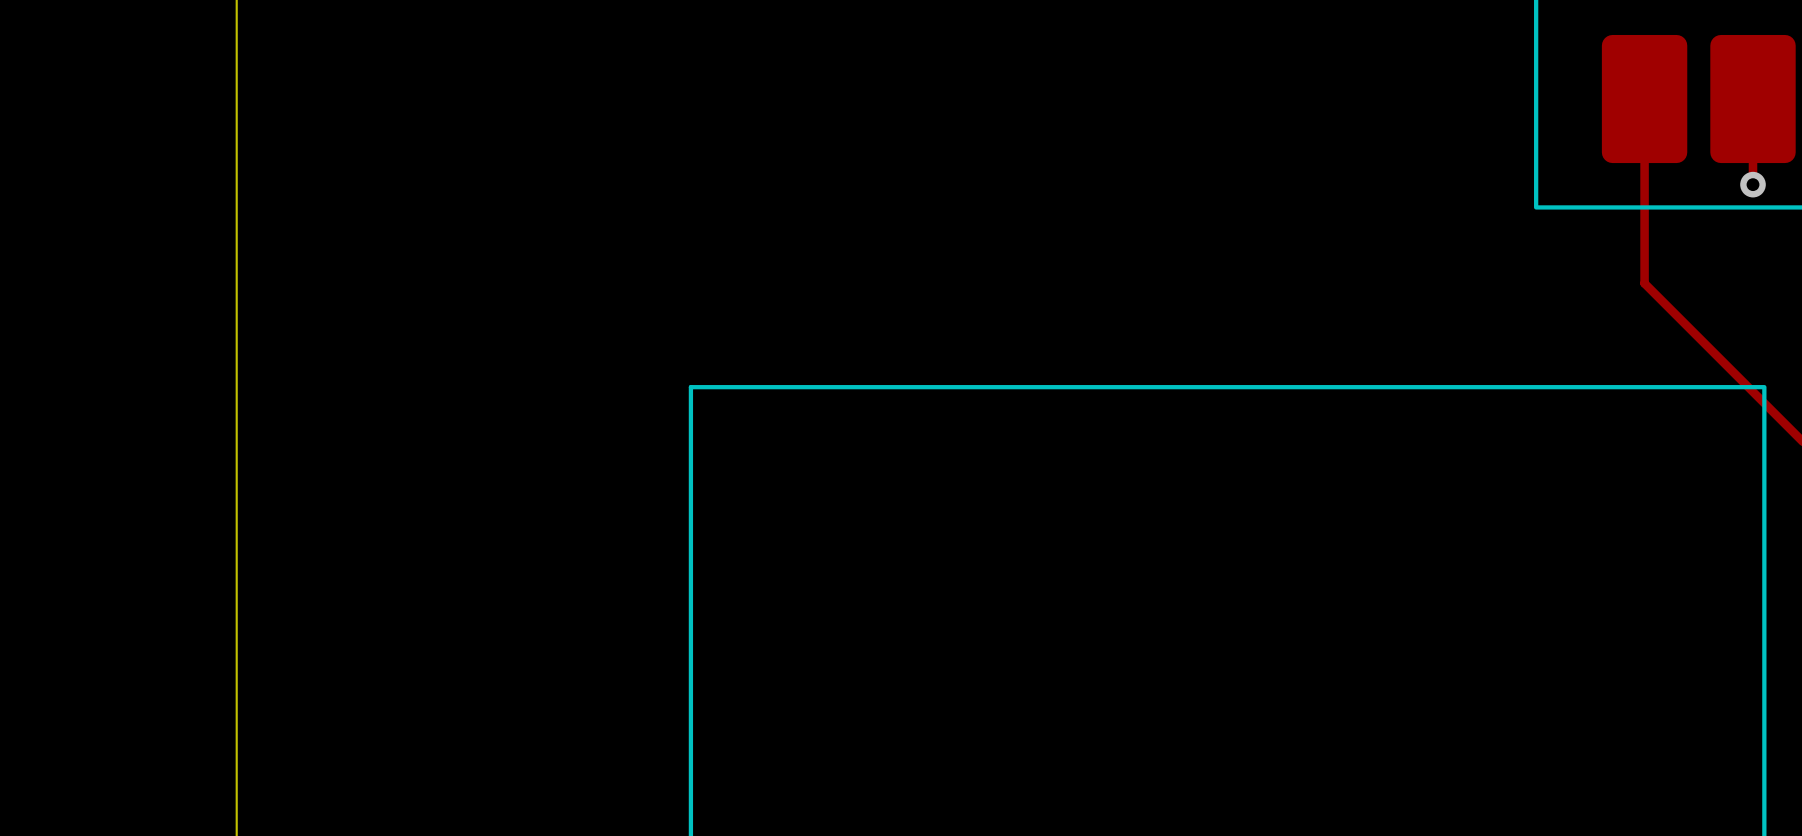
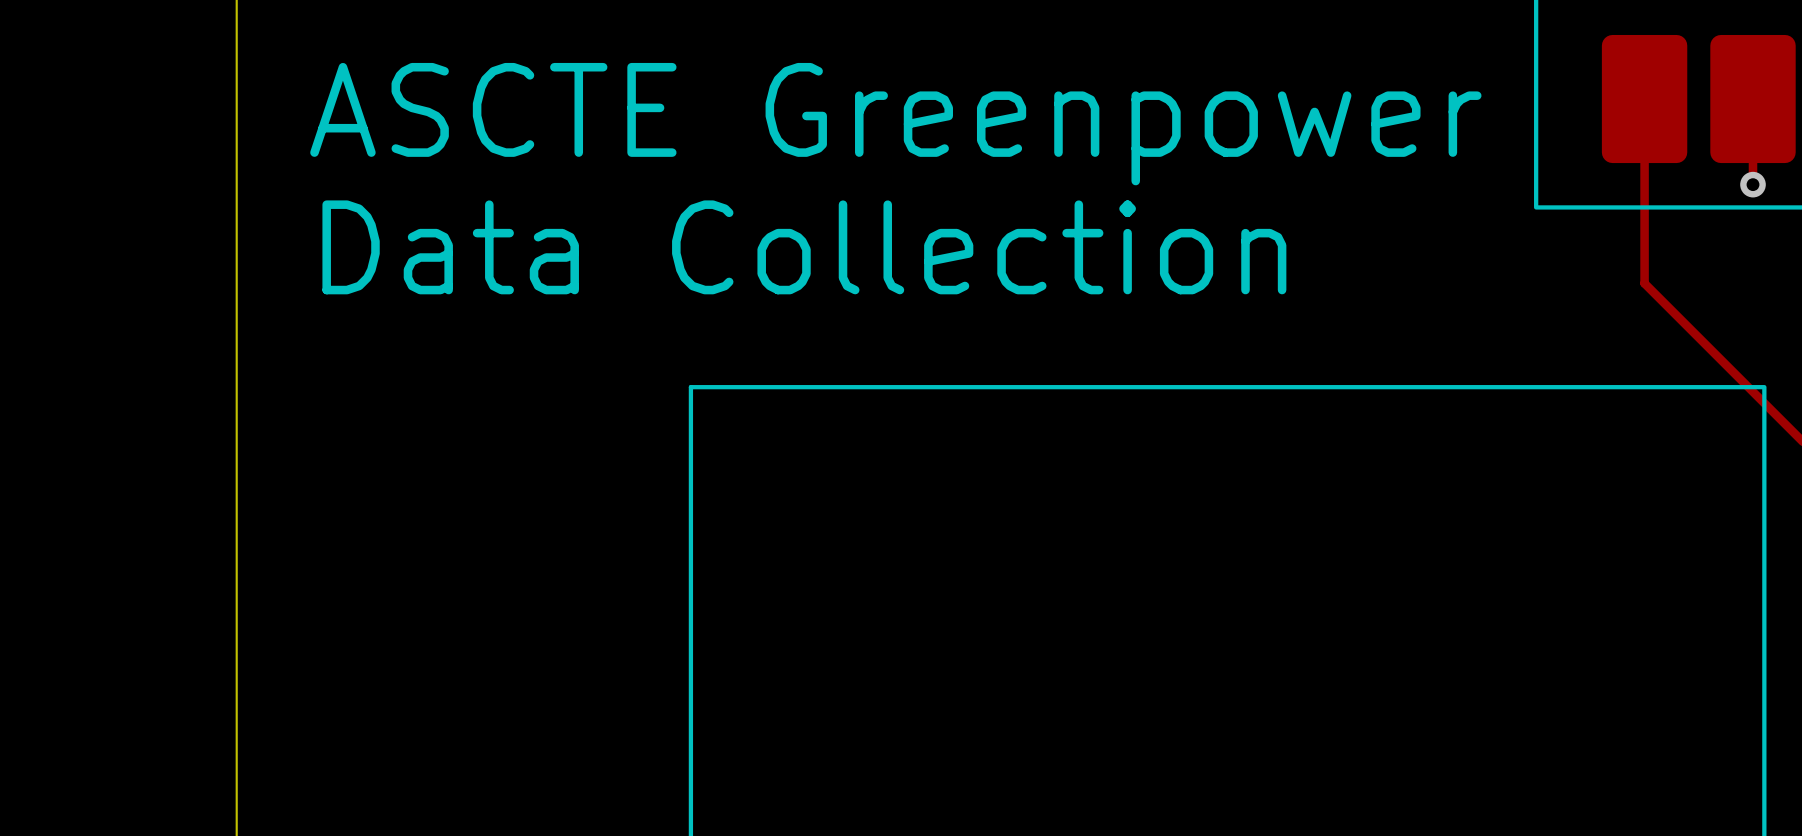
text: none -> ASCTE Greenpower (895, 124)
text: none -> Data Collection (804, 247)

